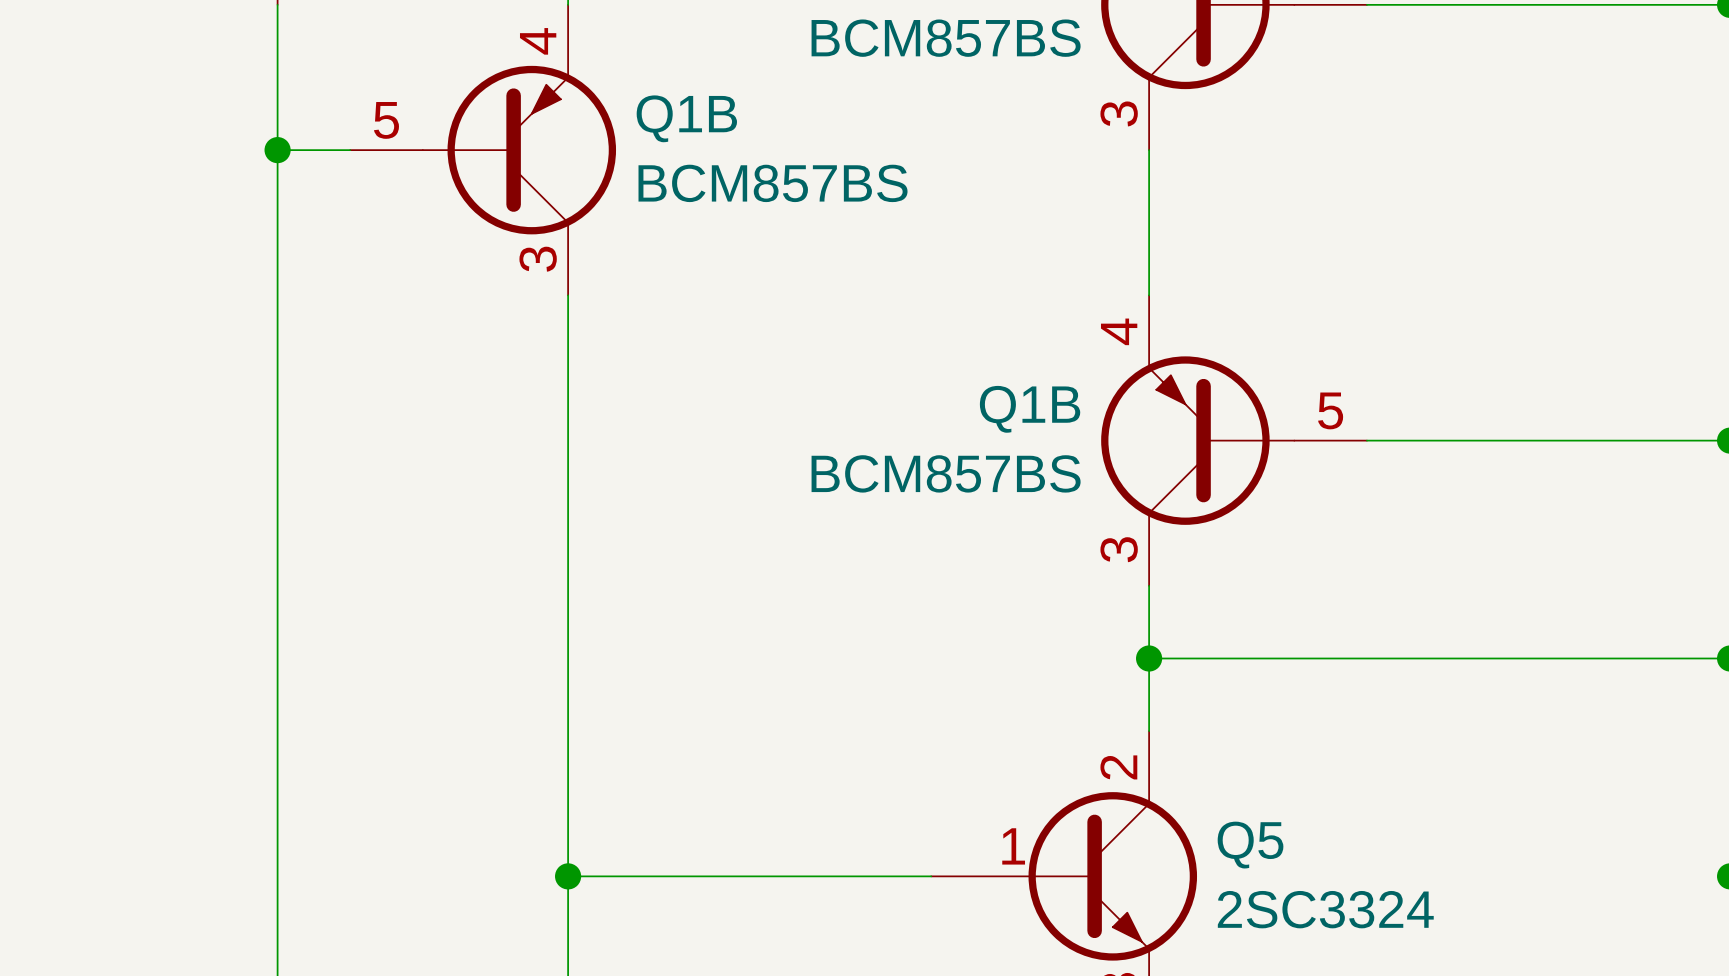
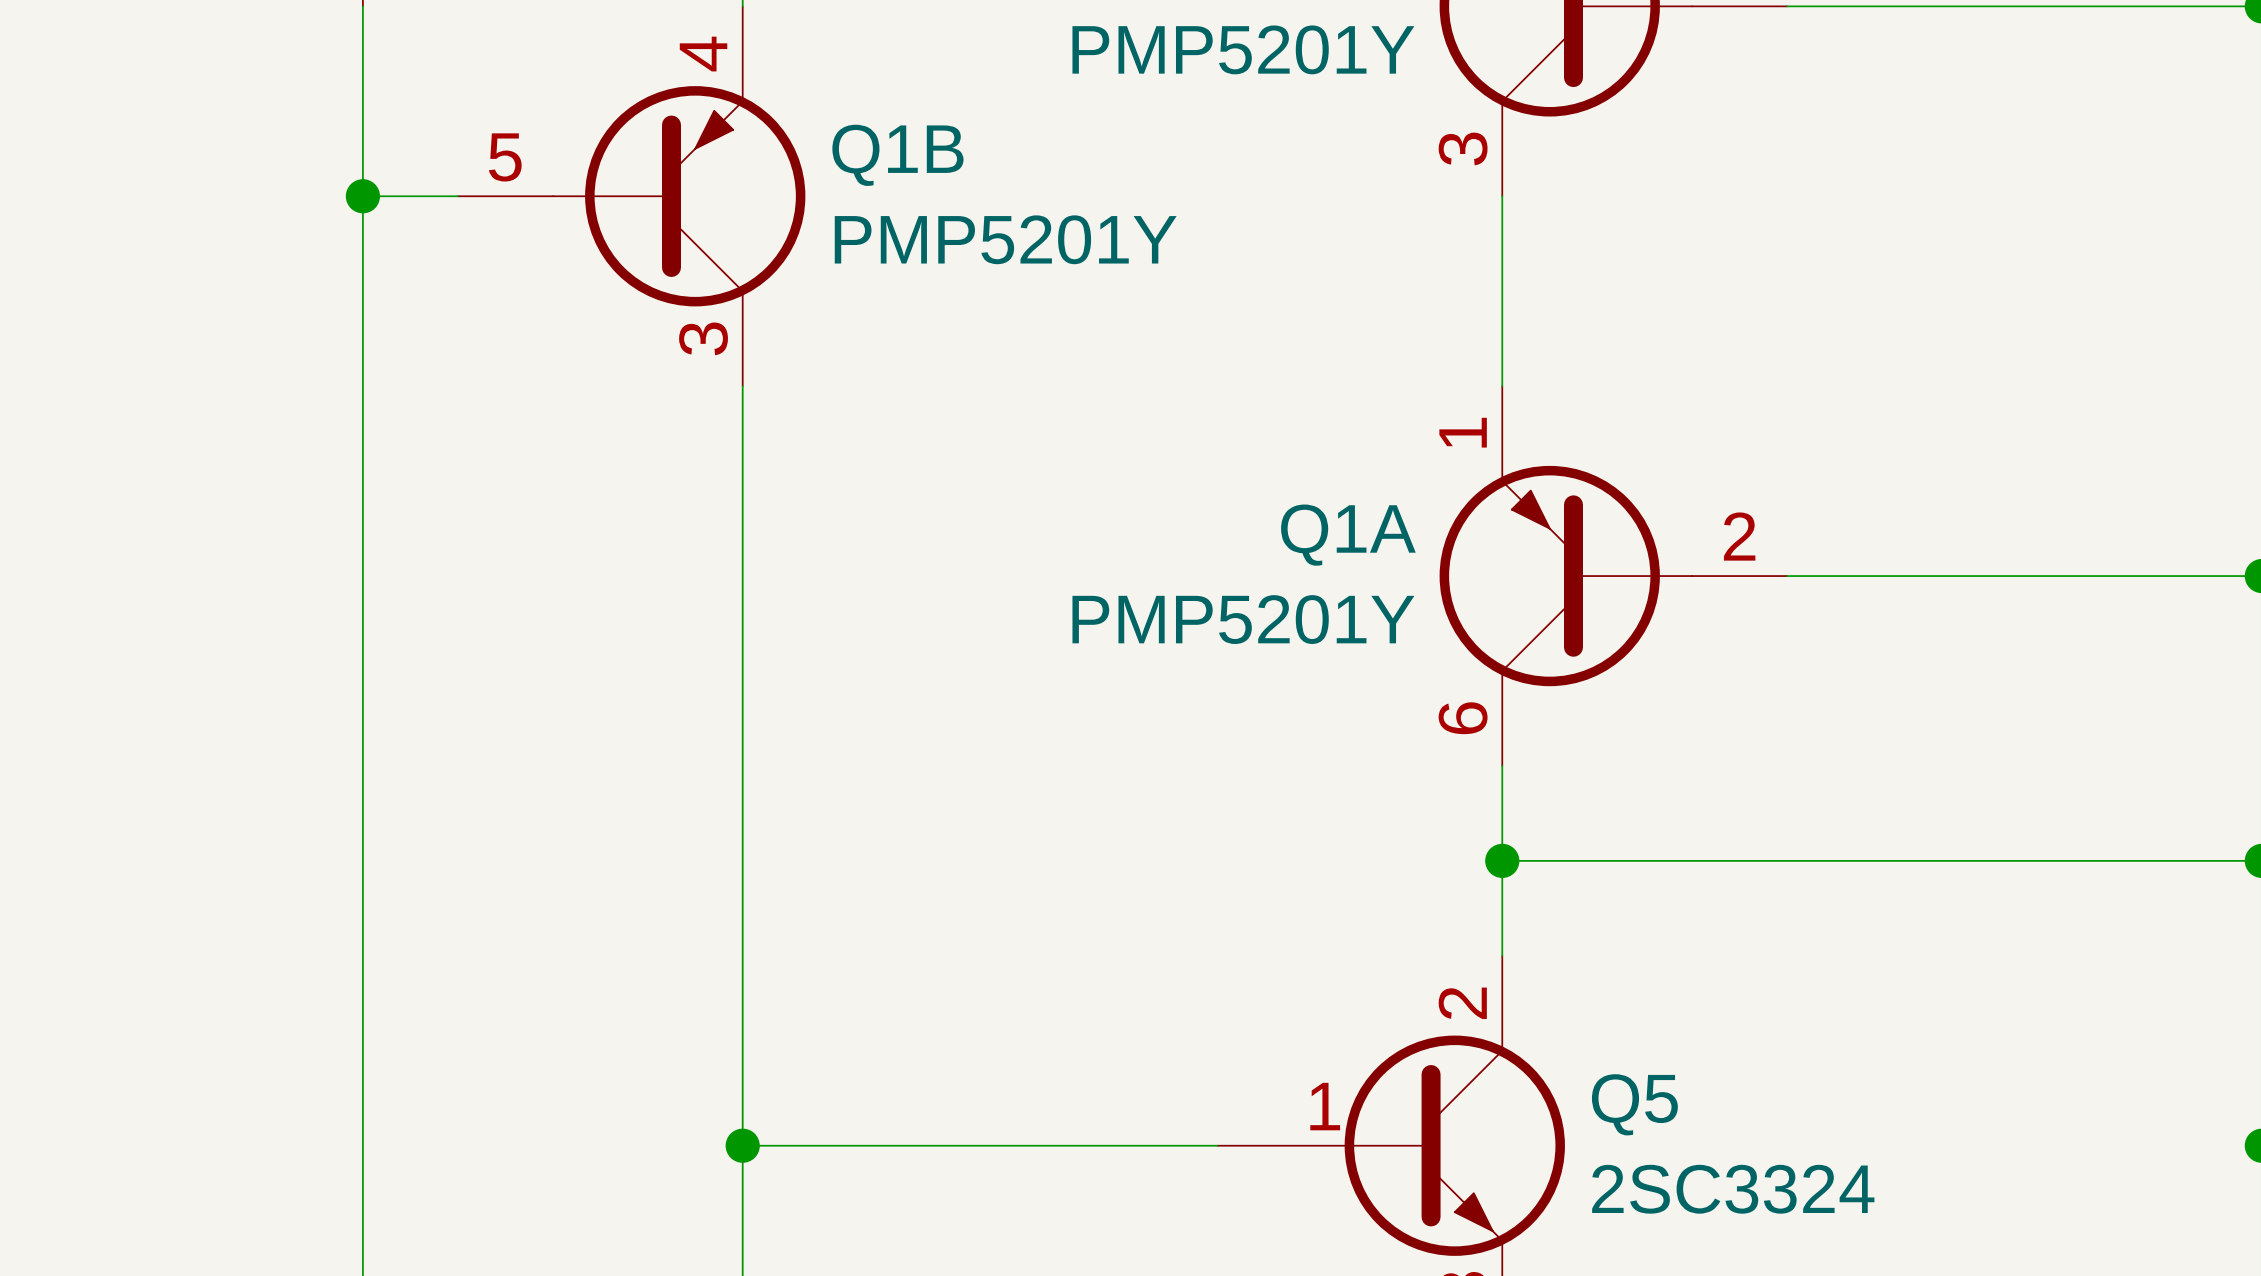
part value: BCM857BS (946, 38) -> PMP5201Y (1243, 49)
Q1B value: BCM857BS (773, 183) -> PMP5201Y (1005, 239)
Q1B pin number: 4 (1119, 331) -> 1 (1463, 432)
Q1B name: Q1B (1030, 409) -> Q1A (1348, 535)
Q1B pin number: 5 (1330, 410) -> 2 (1739, 536)
Q1B value: BCM857BS (946, 473) -> PMP5201Y (1243, 619)
Q1B pin number: 3 (1119, 549) -> 6 (1463, 718)

